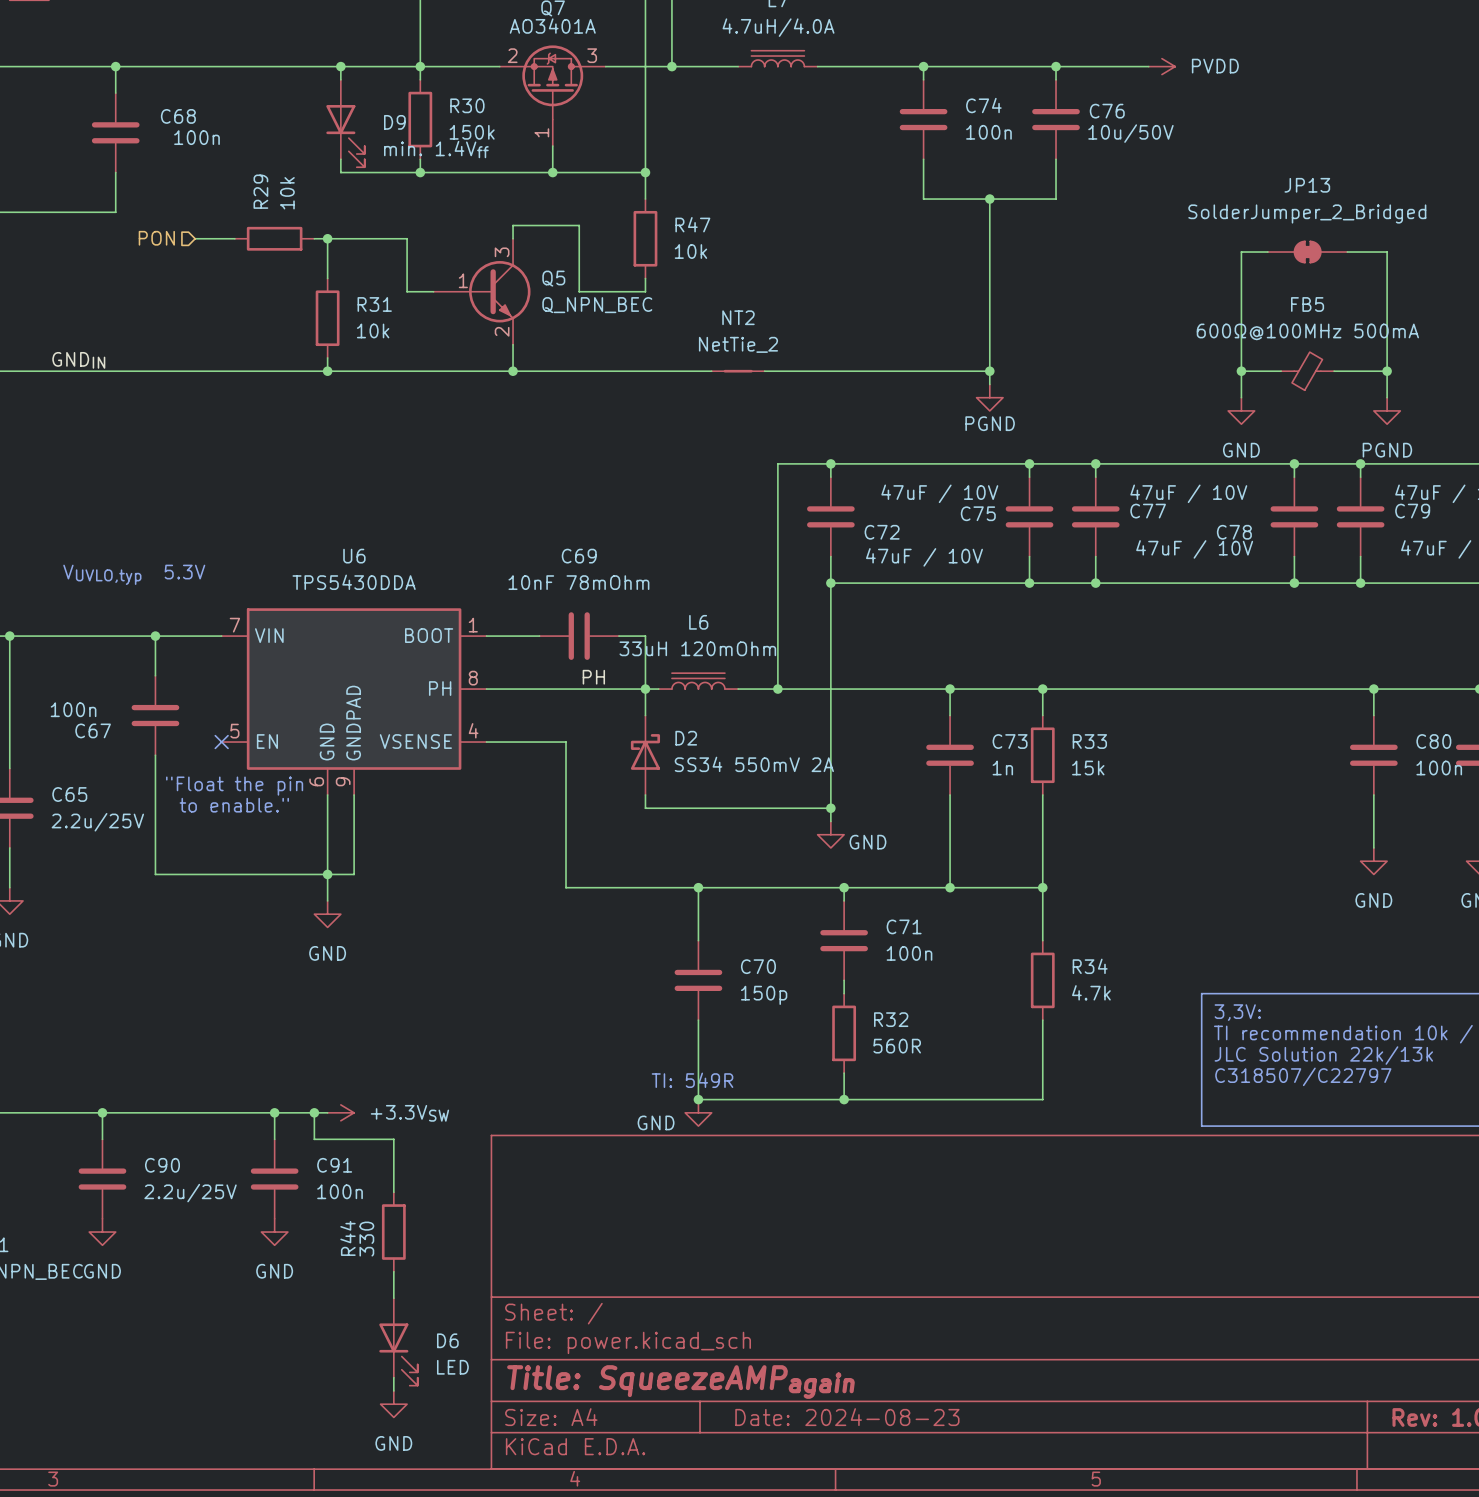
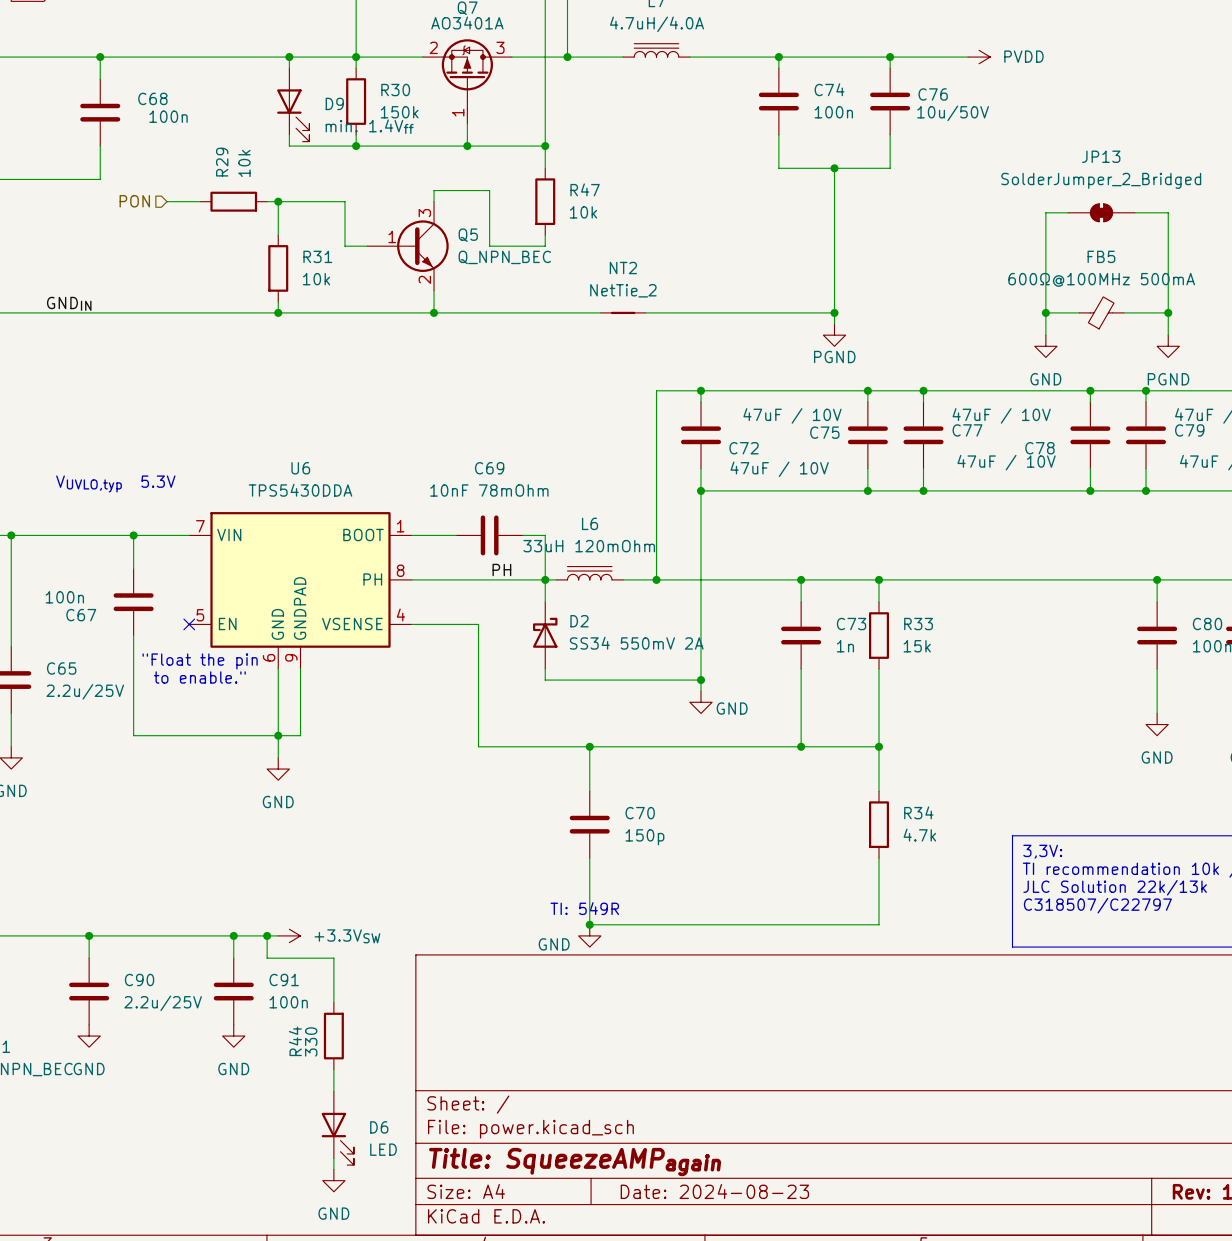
wire: (844, 887) (844, 900) -> none
junction: (844, 887) -> none
C71: 100n (844, 940) -> none
wire: (844, 980) (844, 993) -> none
R32: 560R (844, 1033) -> none
wire: (844, 1073) (844, 1099) -> none
junction: (844, 1099) -> none

